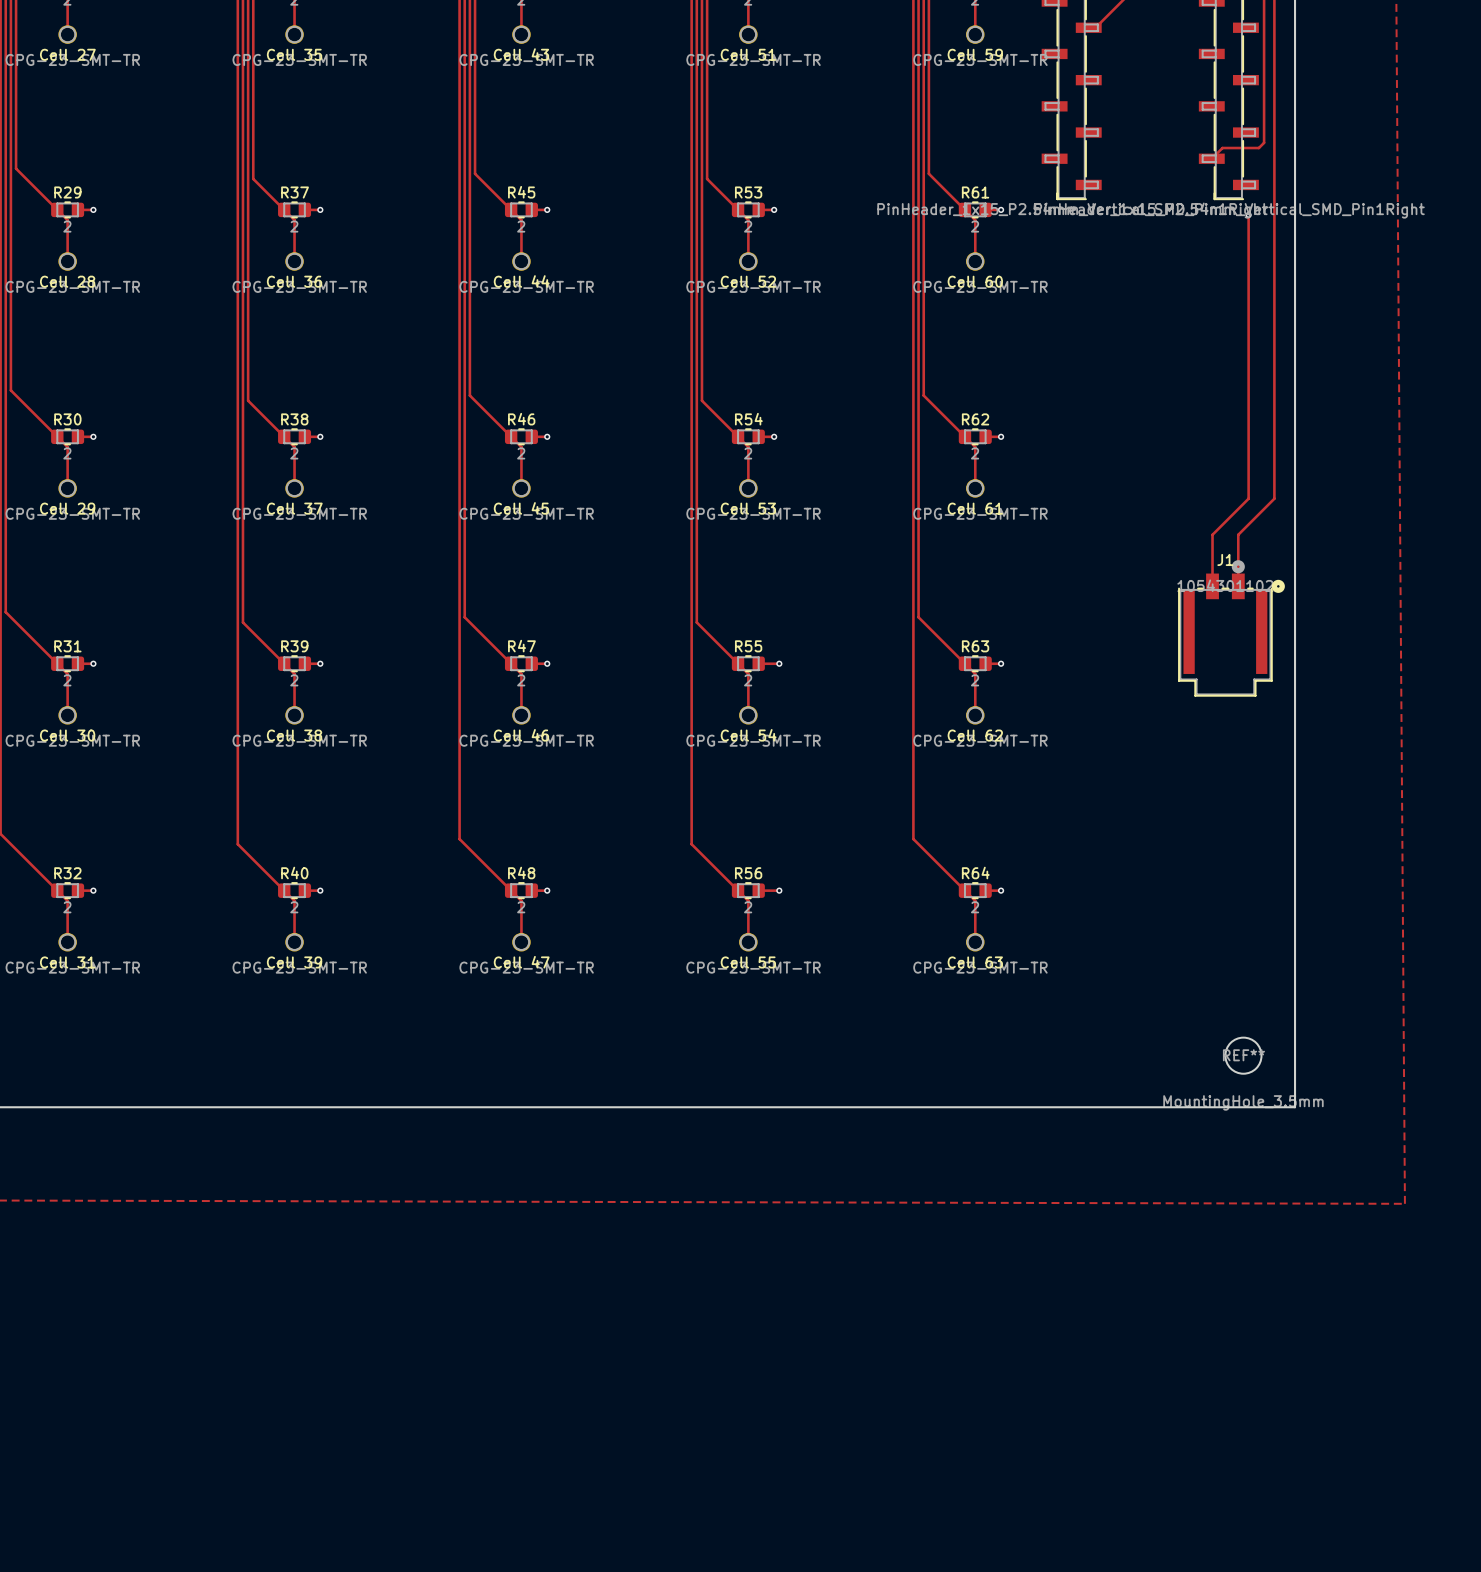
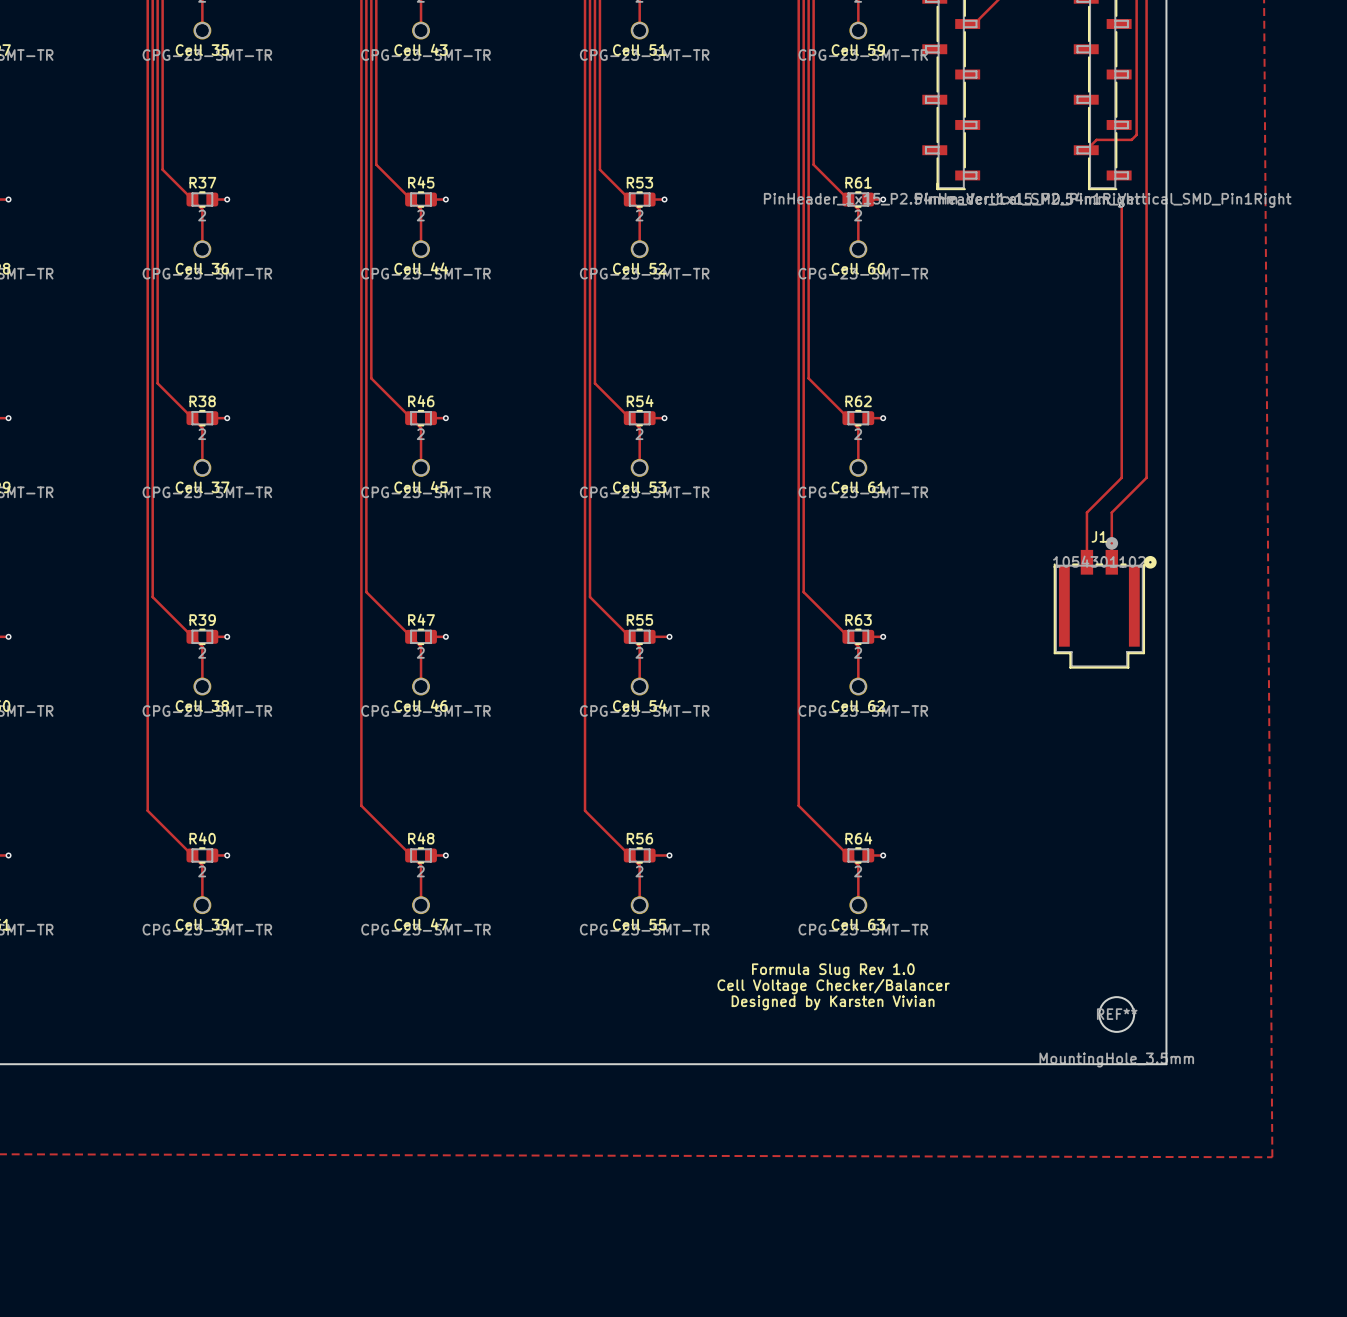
text: none -> Formula Slug Rev 1.0 (833, 970)
text: none -> Cell Voltage Checker/Balancer (833, 986)
text: none -> Designed by Karsten Vivian (833, 1002)

